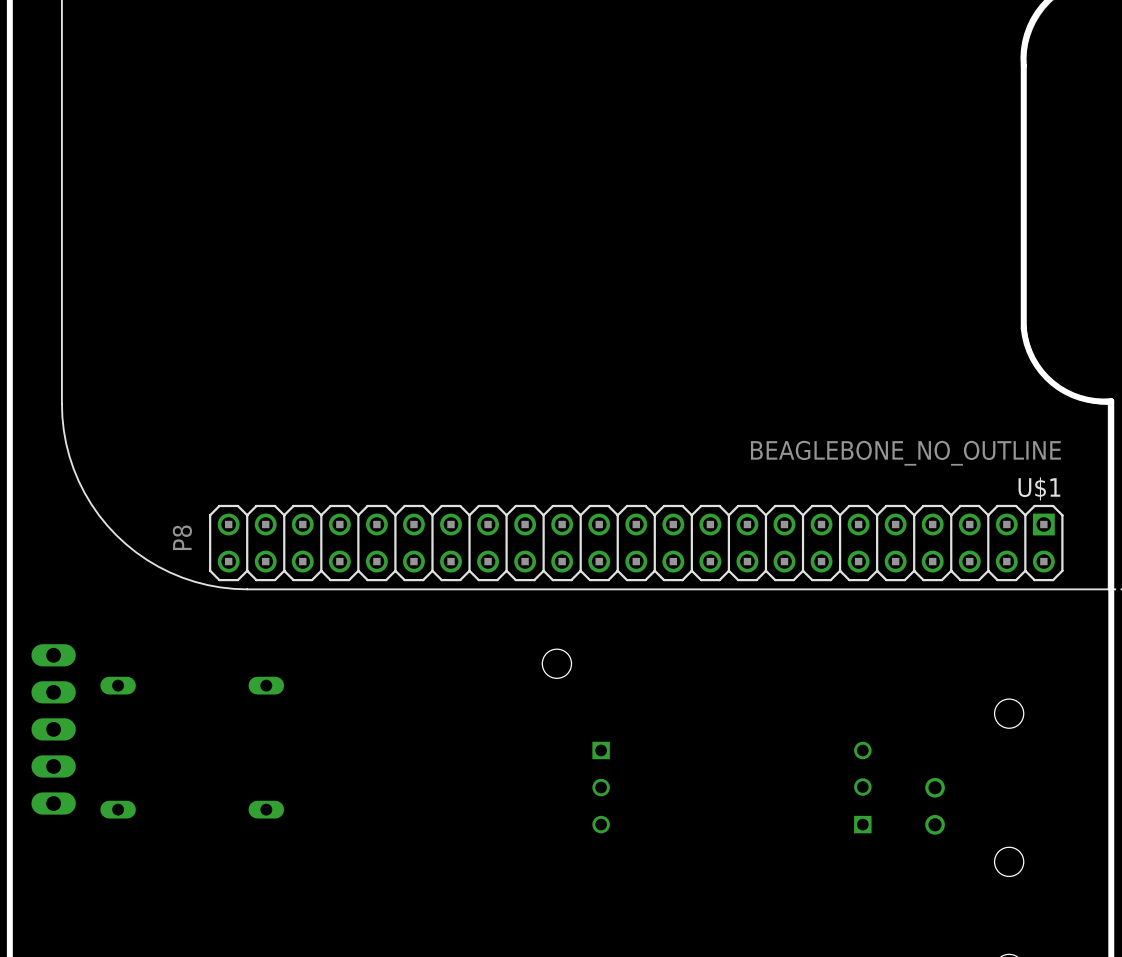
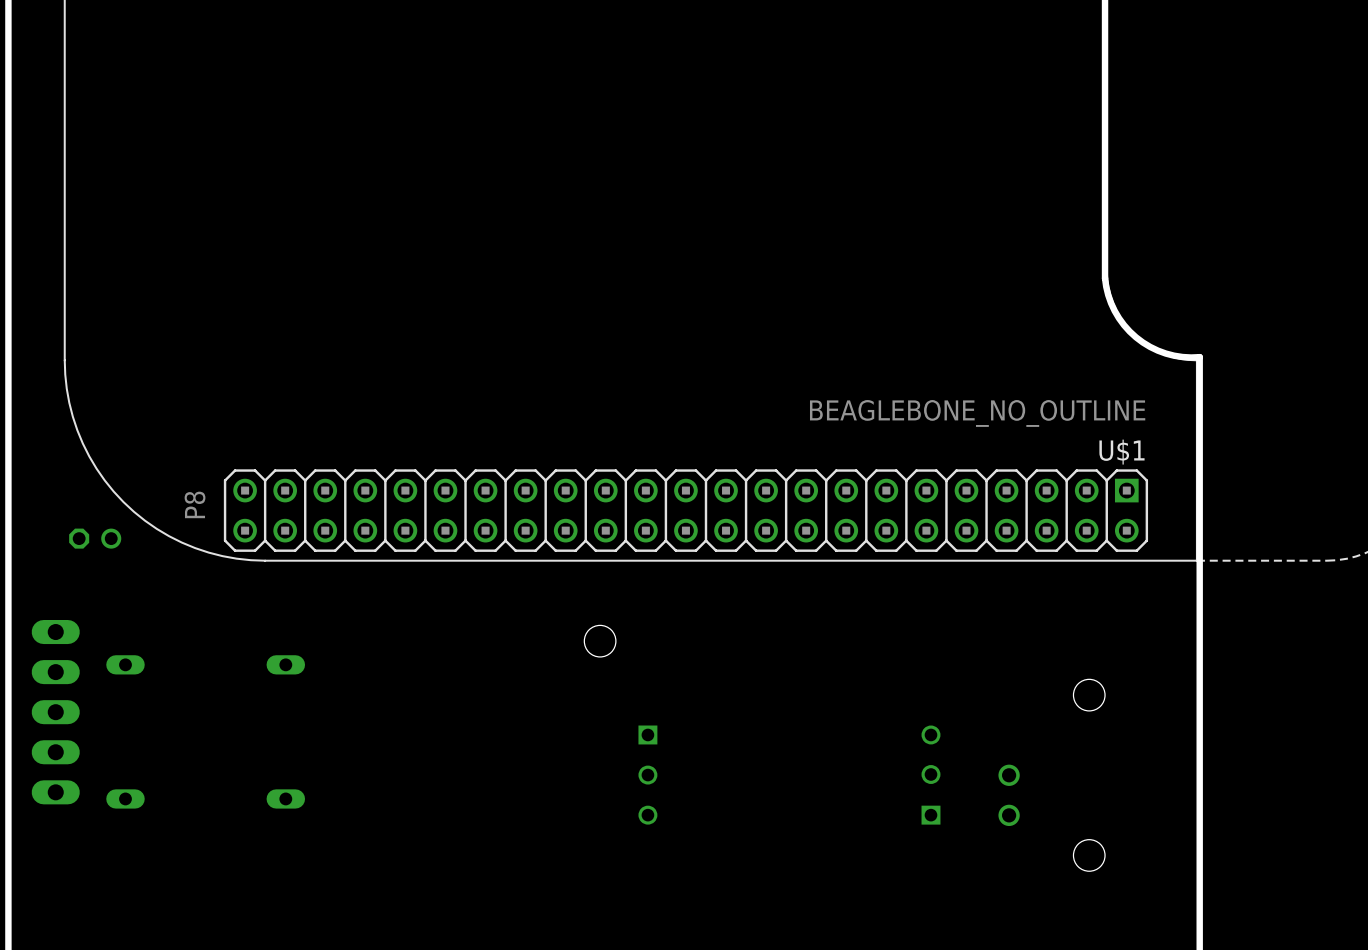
part: none -> (95, 538)

